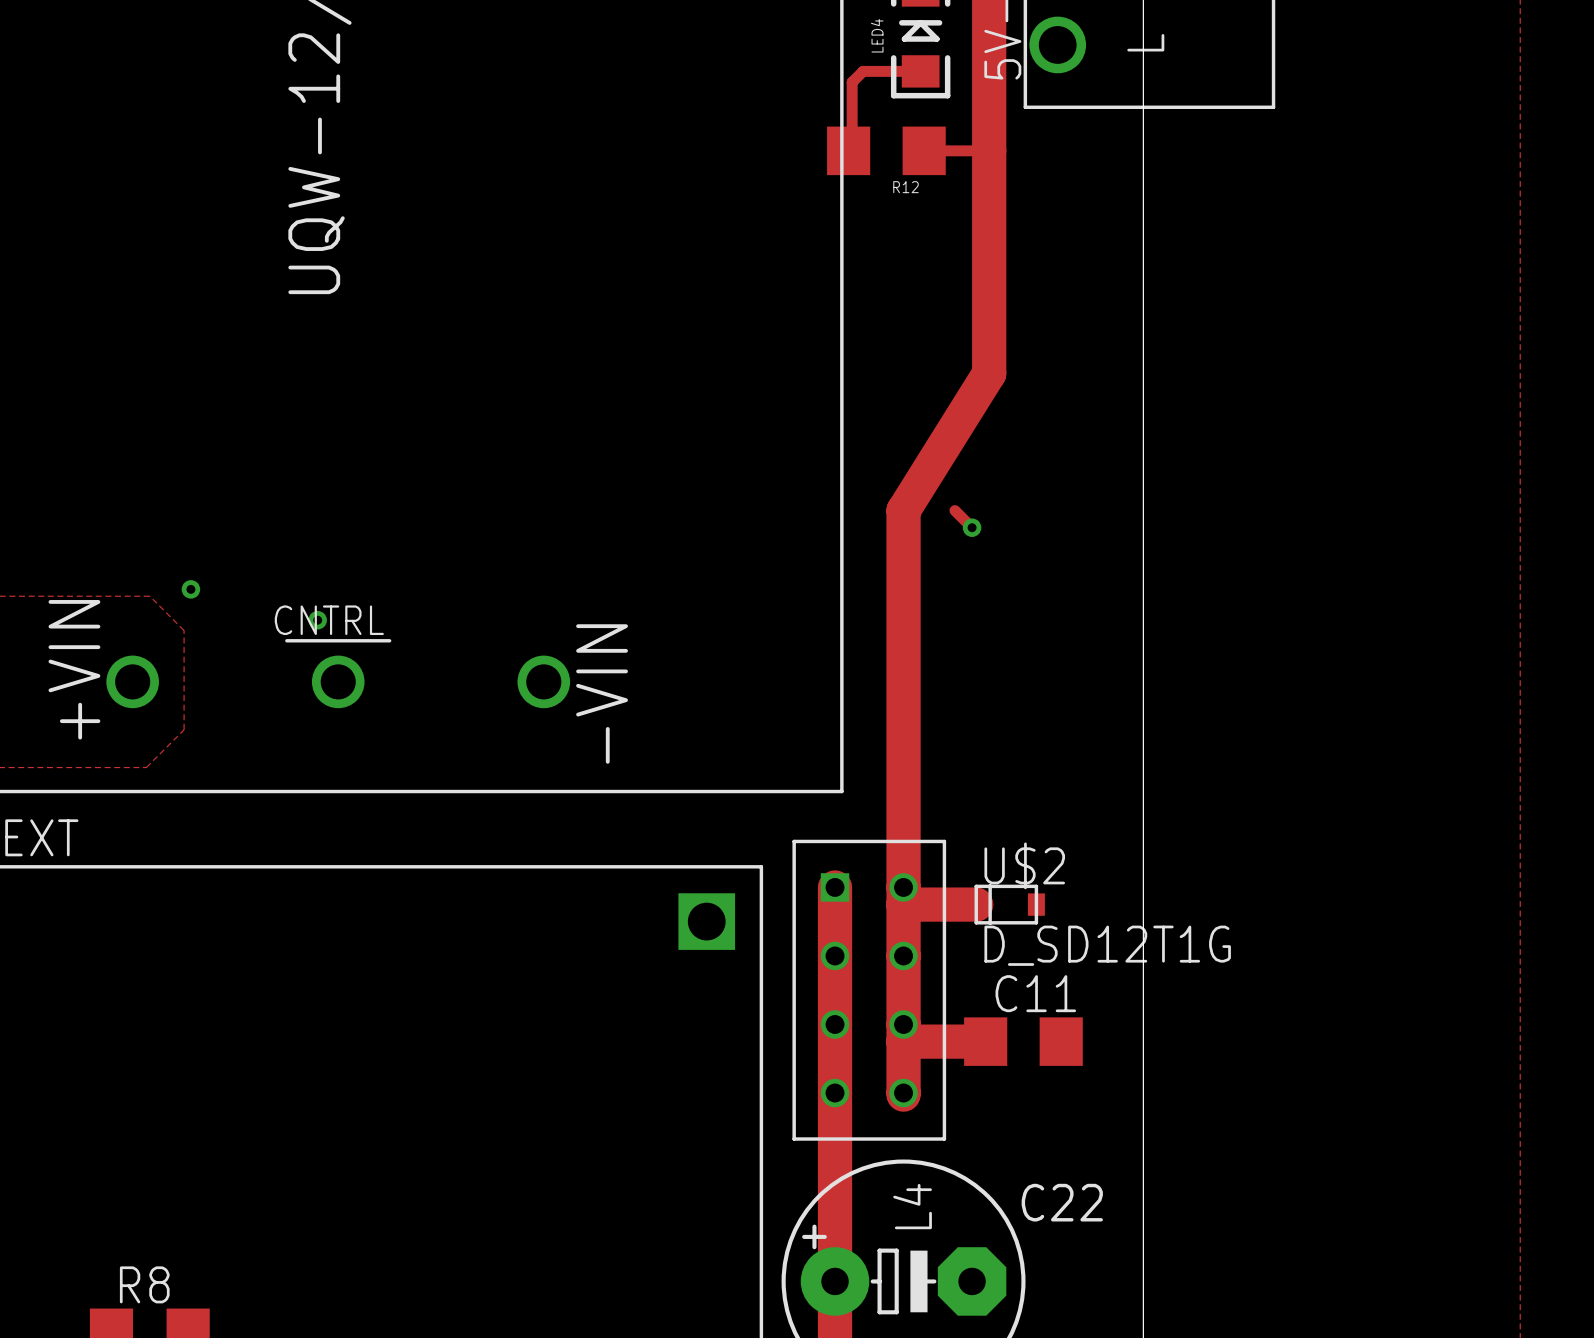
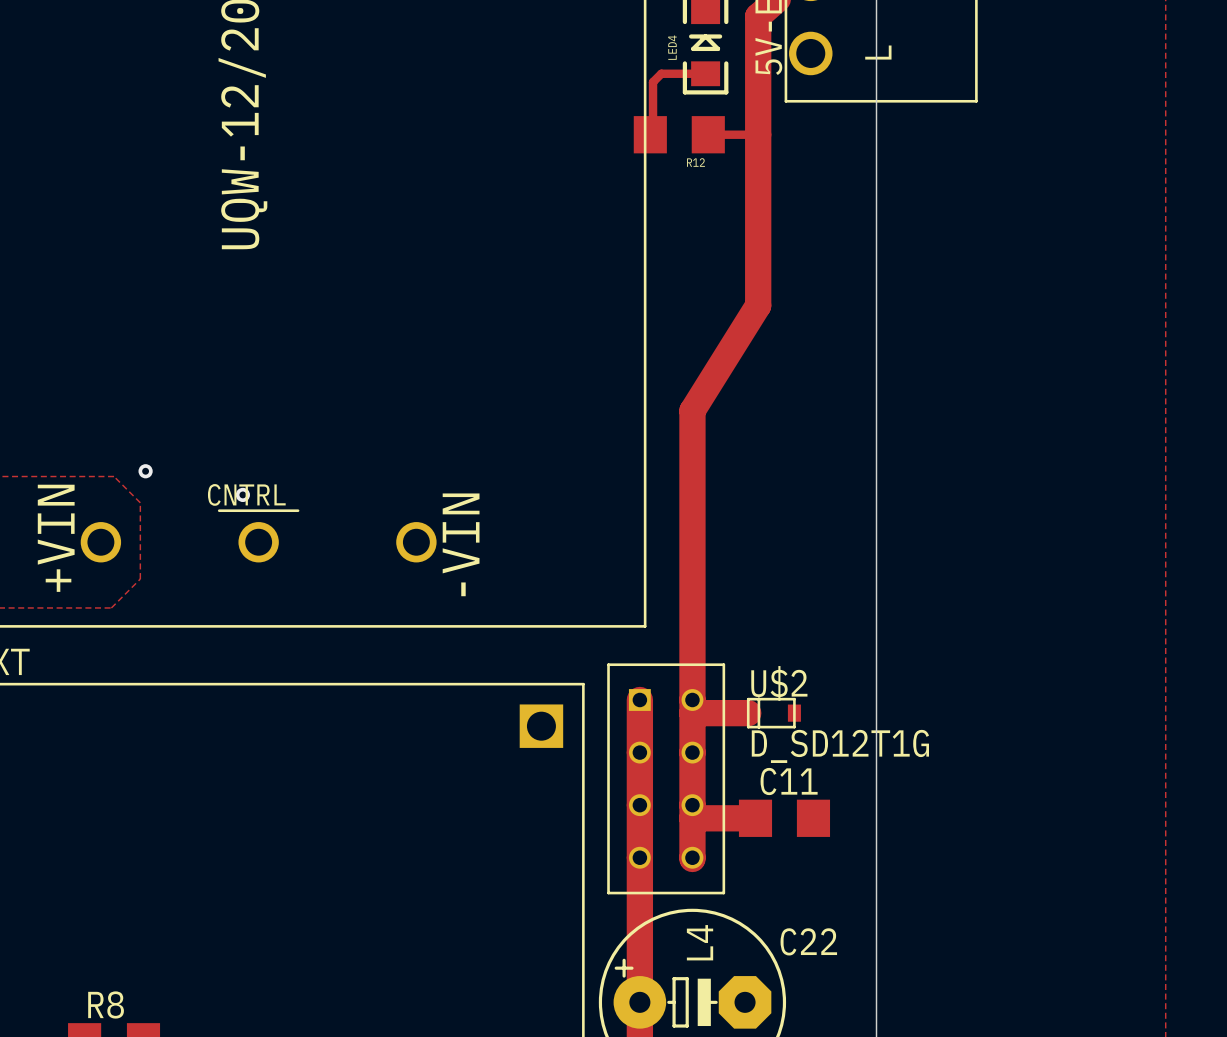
track: (954, 510) (972, 527) -> none
via: (972, 527) -> none

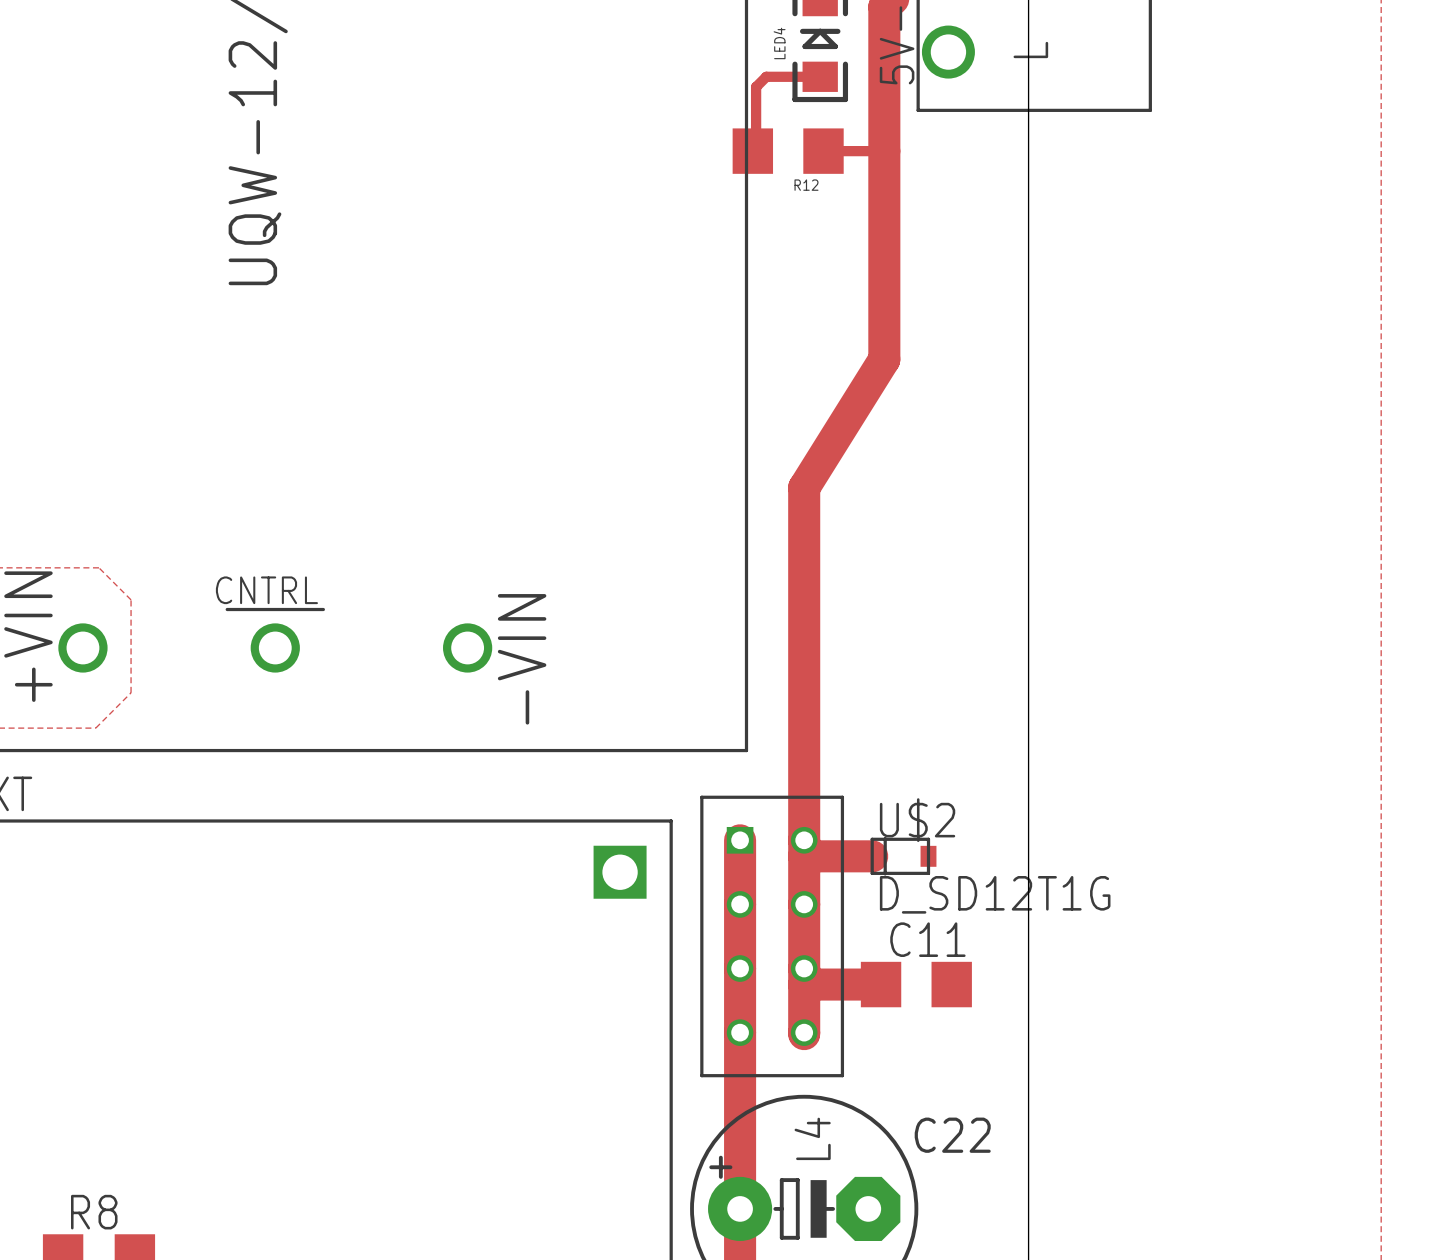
via: (145, 471) -> none
via: (242, 494) -> none

